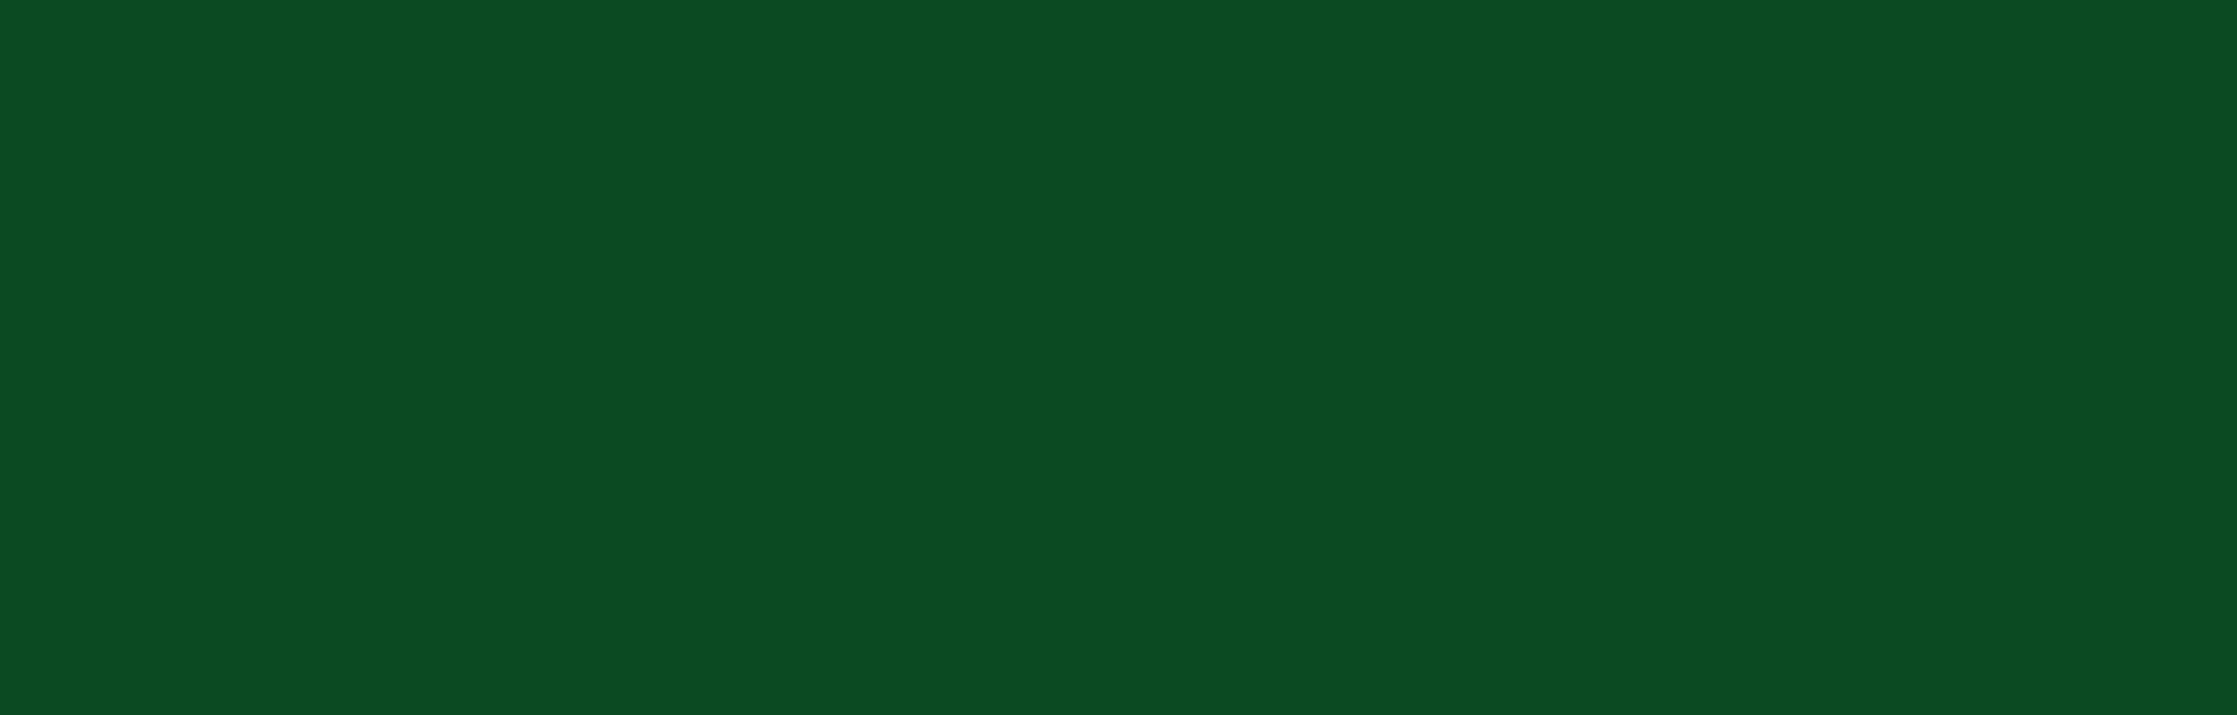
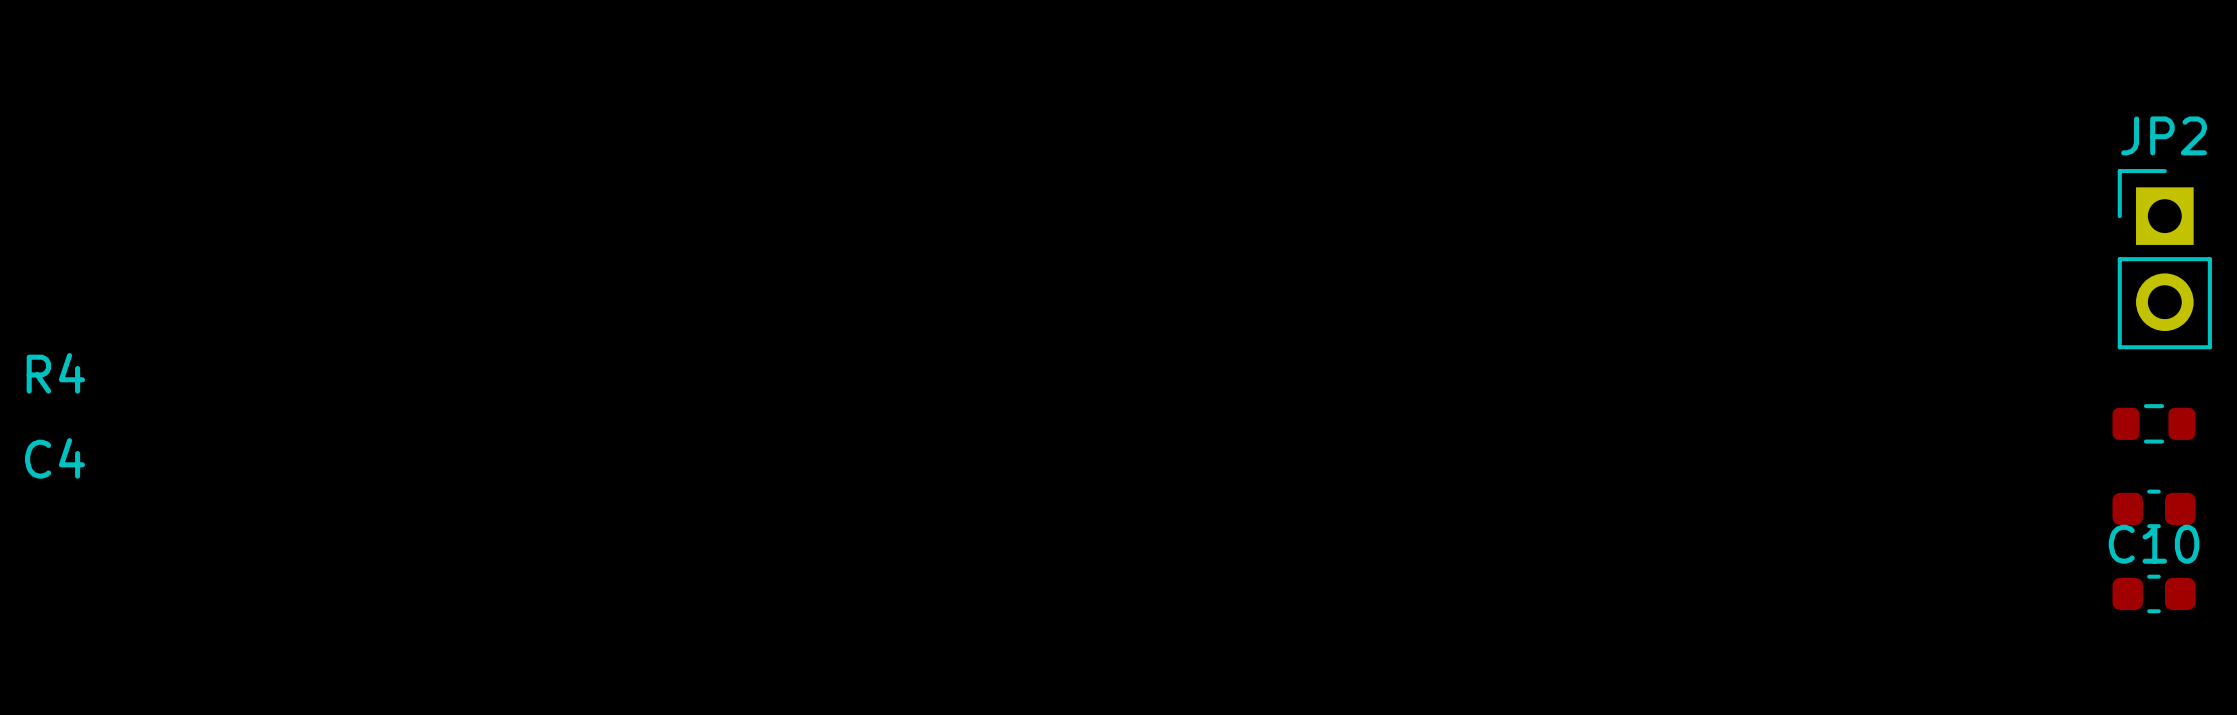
JP2: none -> (2164, 259)
R4: none -> (2153, 423)
C4: none -> (2153, 508)
C10: none -> (2153, 593)

